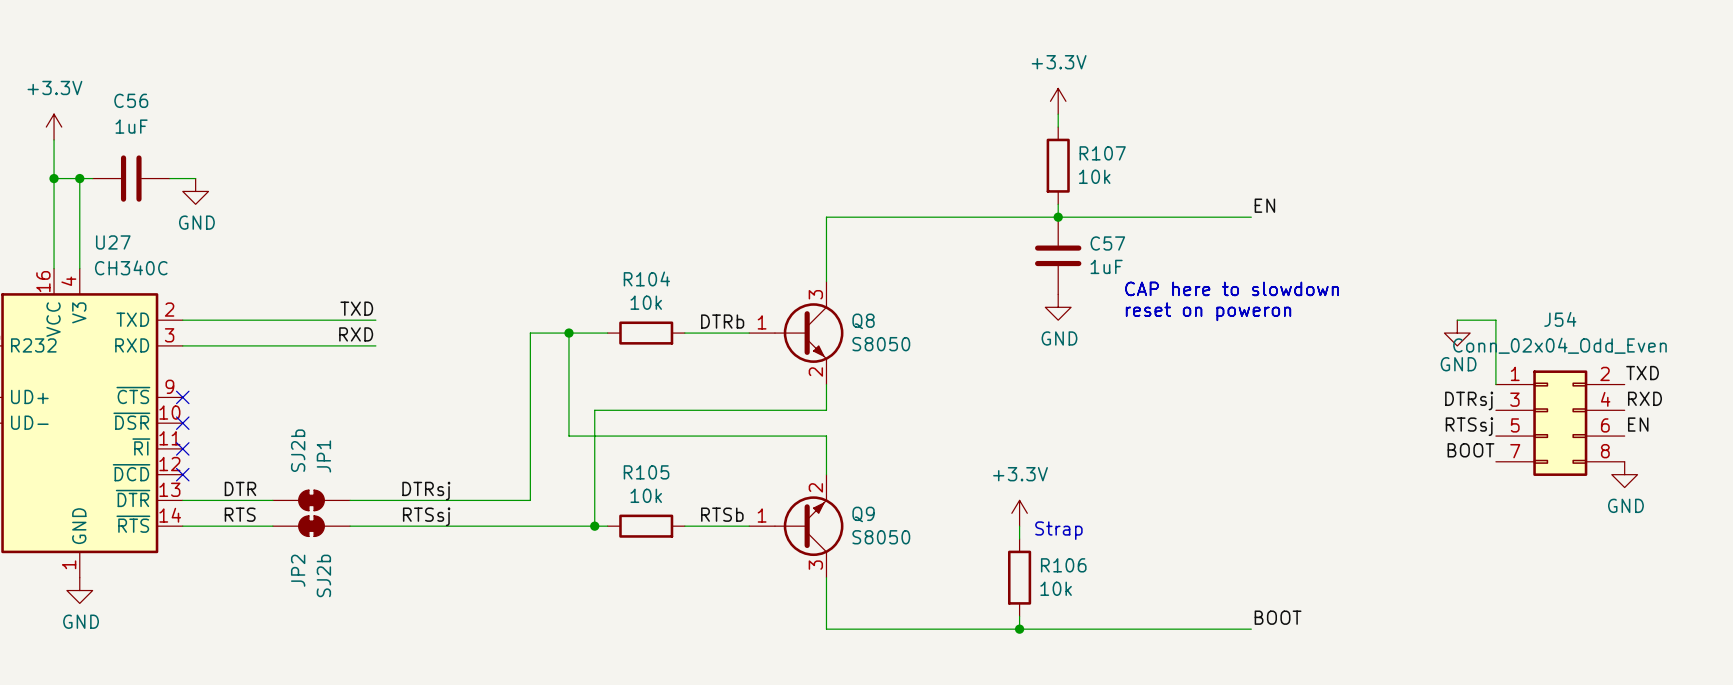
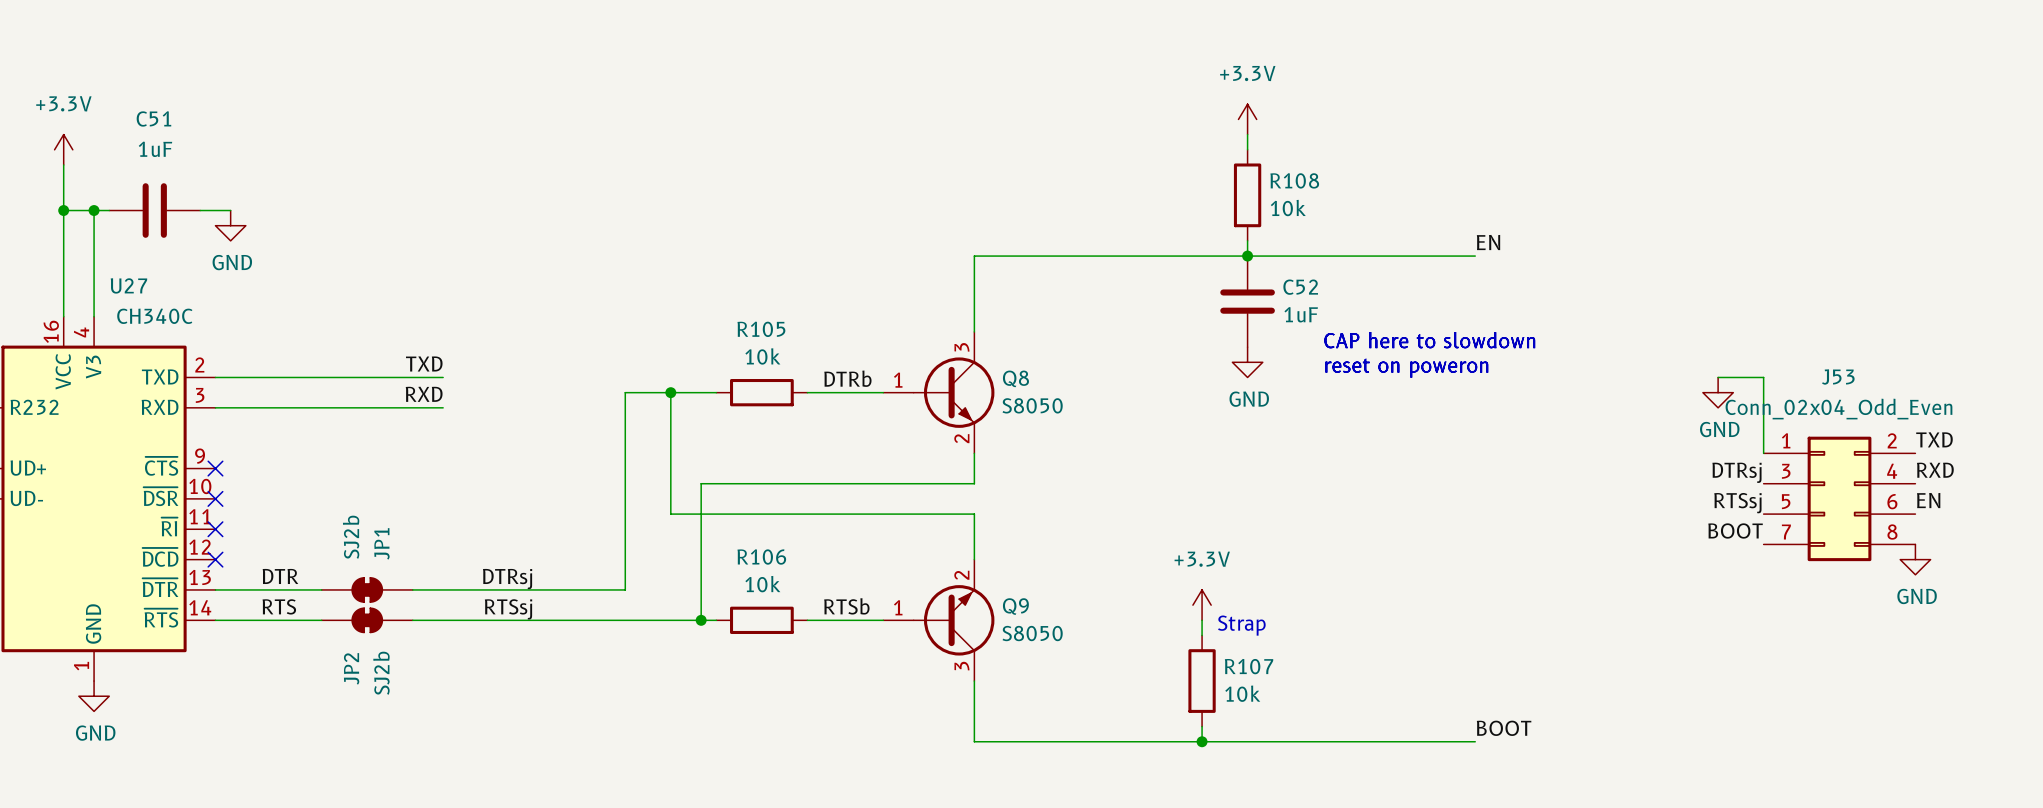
C56 name: C56 (131, 100) -> C51 (153, 118)
R107 name: R107 (1102, 153) -> R108 (1294, 180)
C57 name: C57 (1107, 243) -> C52 (1300, 287)
R104 name: R104 (646, 278) -> R105 (761, 329)
J54 name: J54 (1560, 319) -> J53 (1838, 377)
R105 name: R105 (646, 472) -> R106 (761, 557)
R106 name: R106 (1063, 565) -> R107 (1249, 666)

